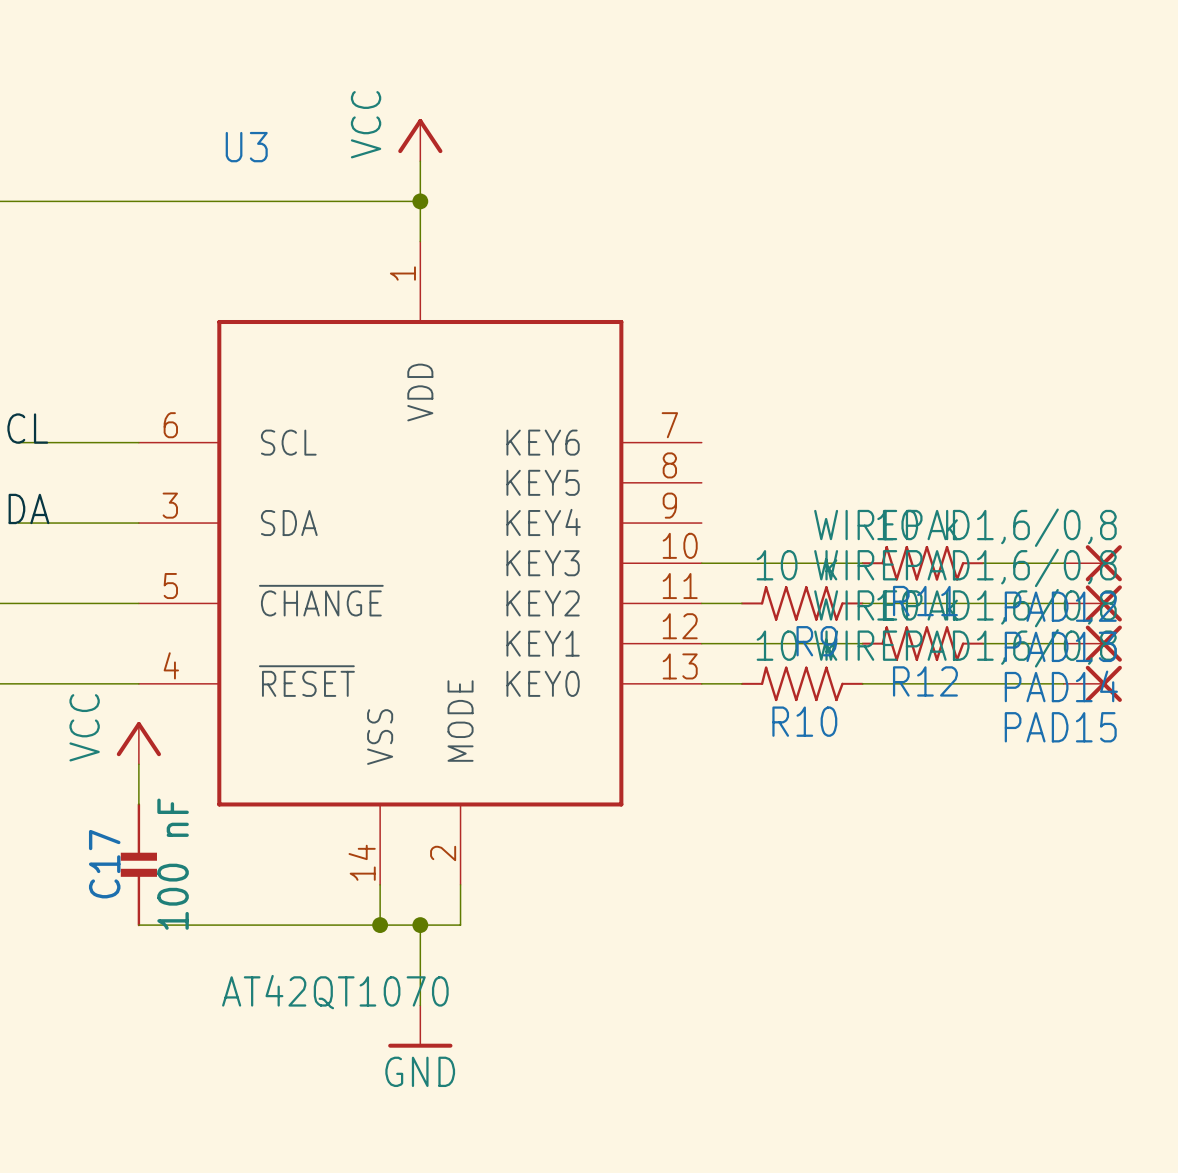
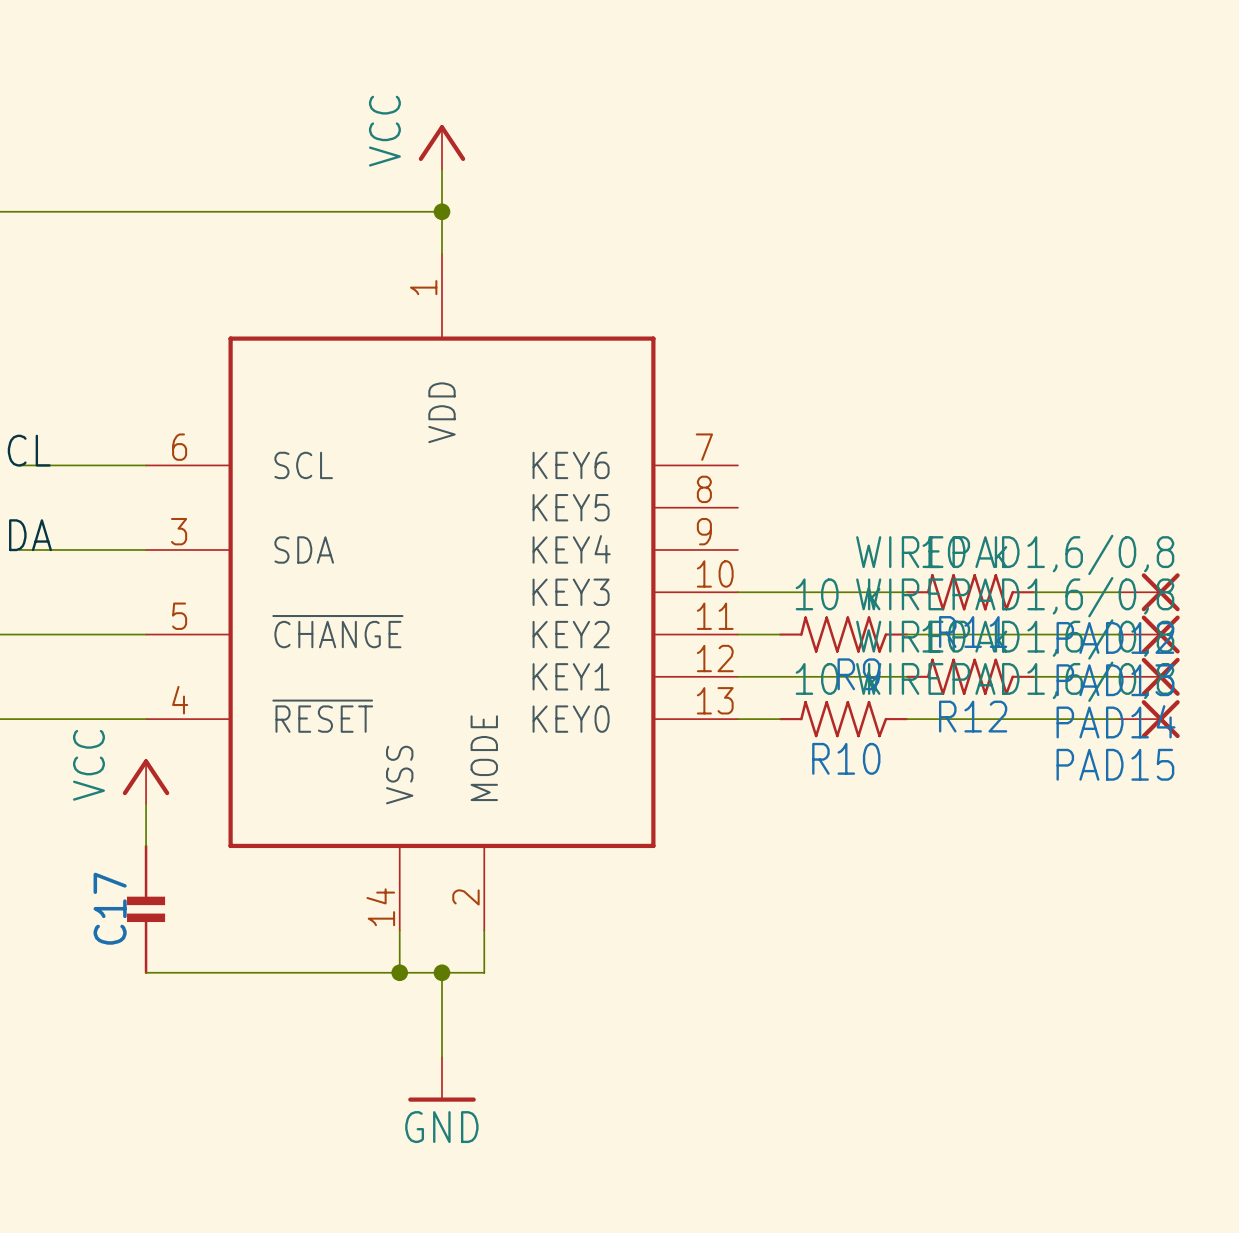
U3 name: U3 (246, 147) -> none
C17 value: 100 nF (173, 864) -> none
U3 value: AT42QT1070 (335, 992) -> none

